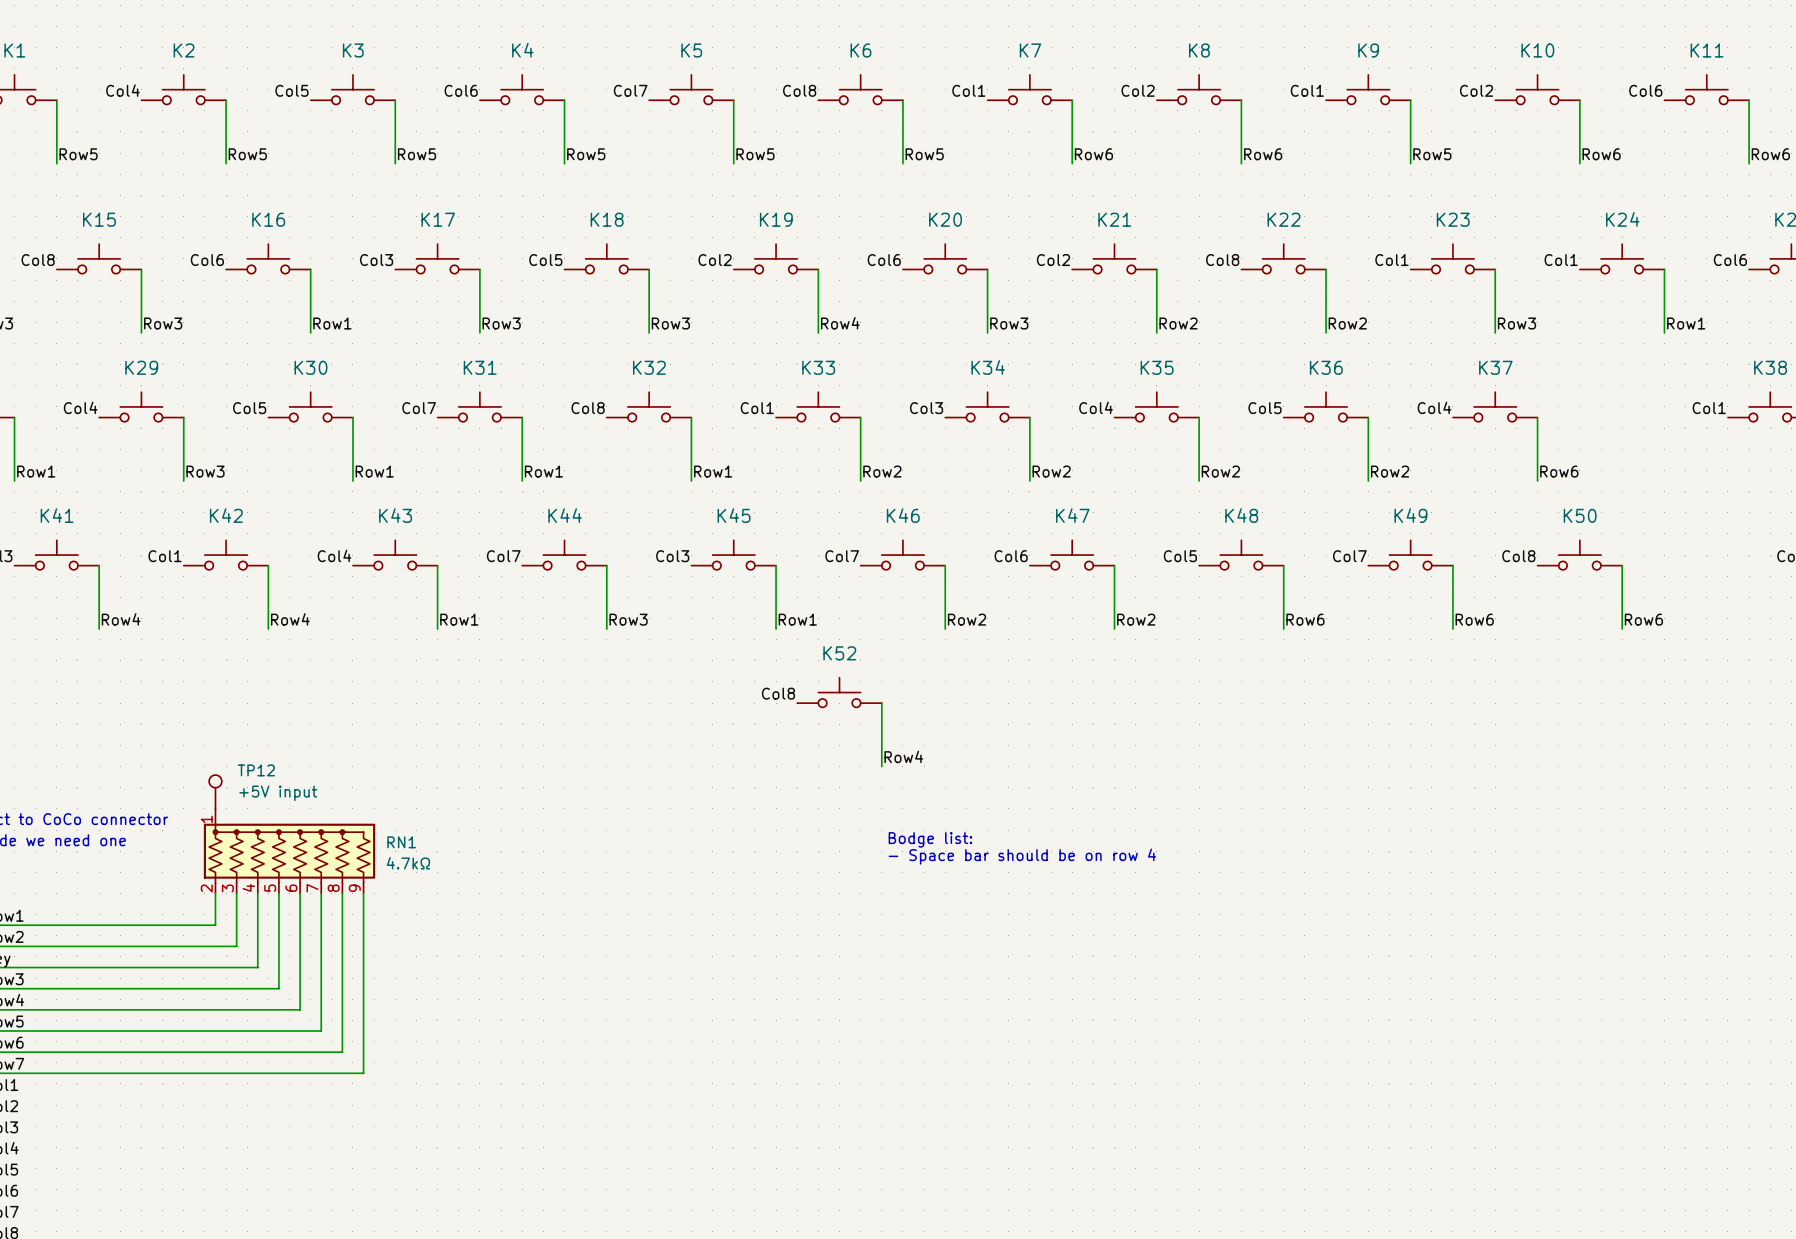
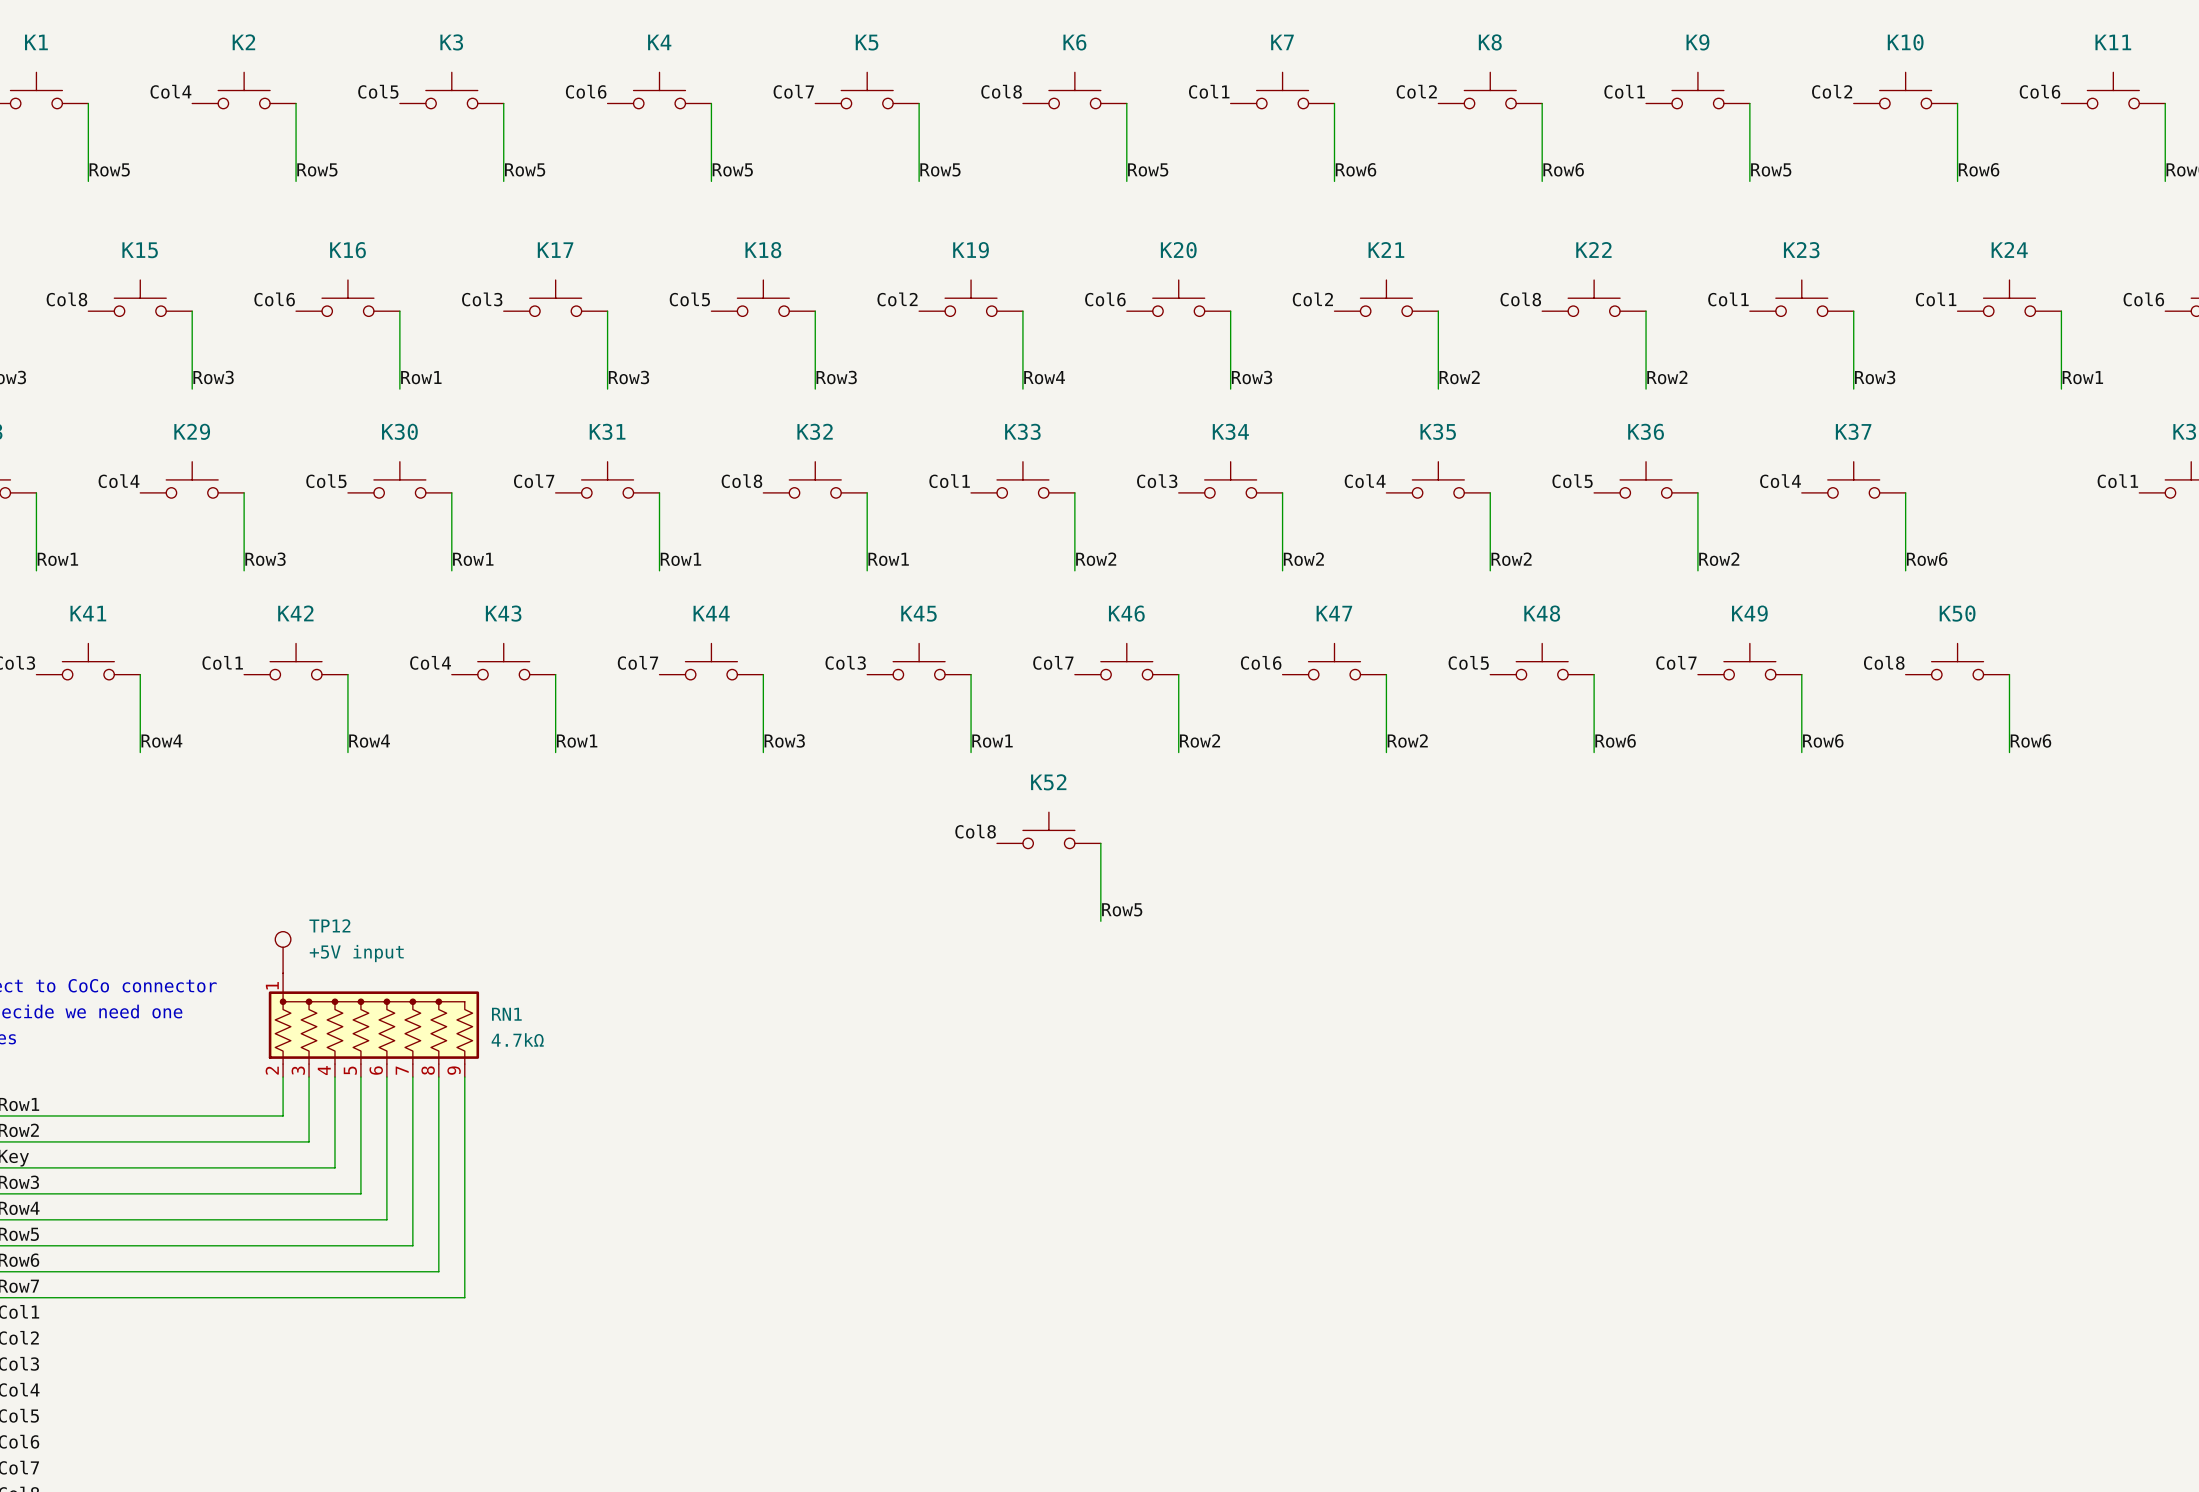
label: Row4 (903, 756) -> Row5 (1122, 909)
text: Bodge list: (930, 839) -> none
text: - Space bar should be on row 4 (1022, 856) -> none

